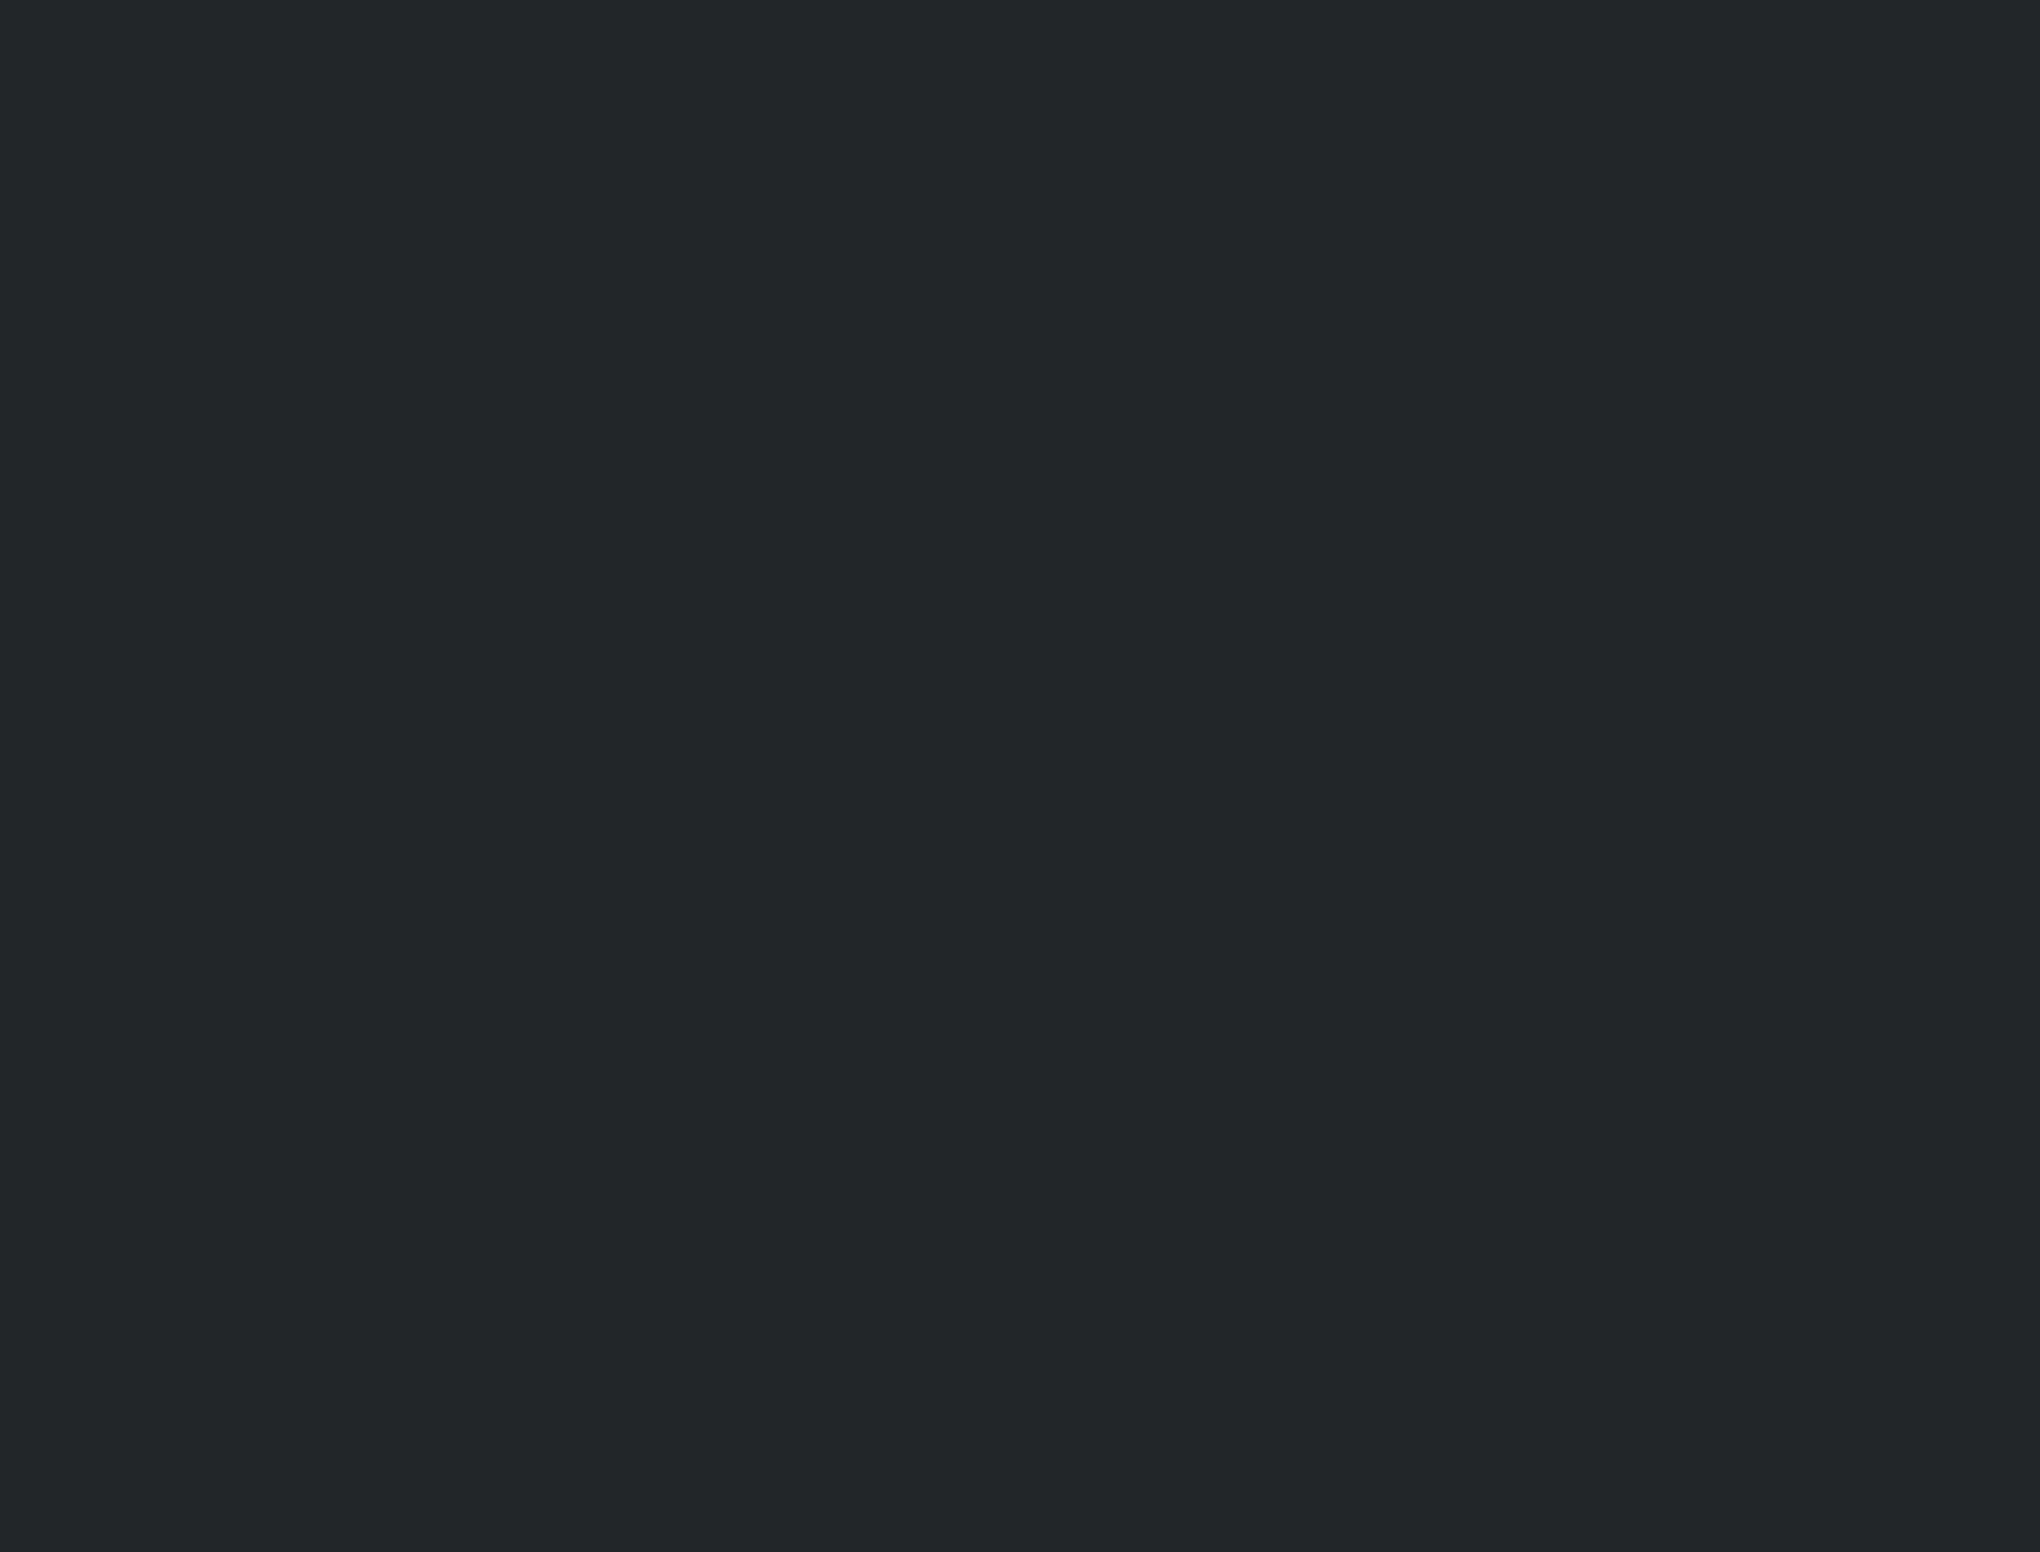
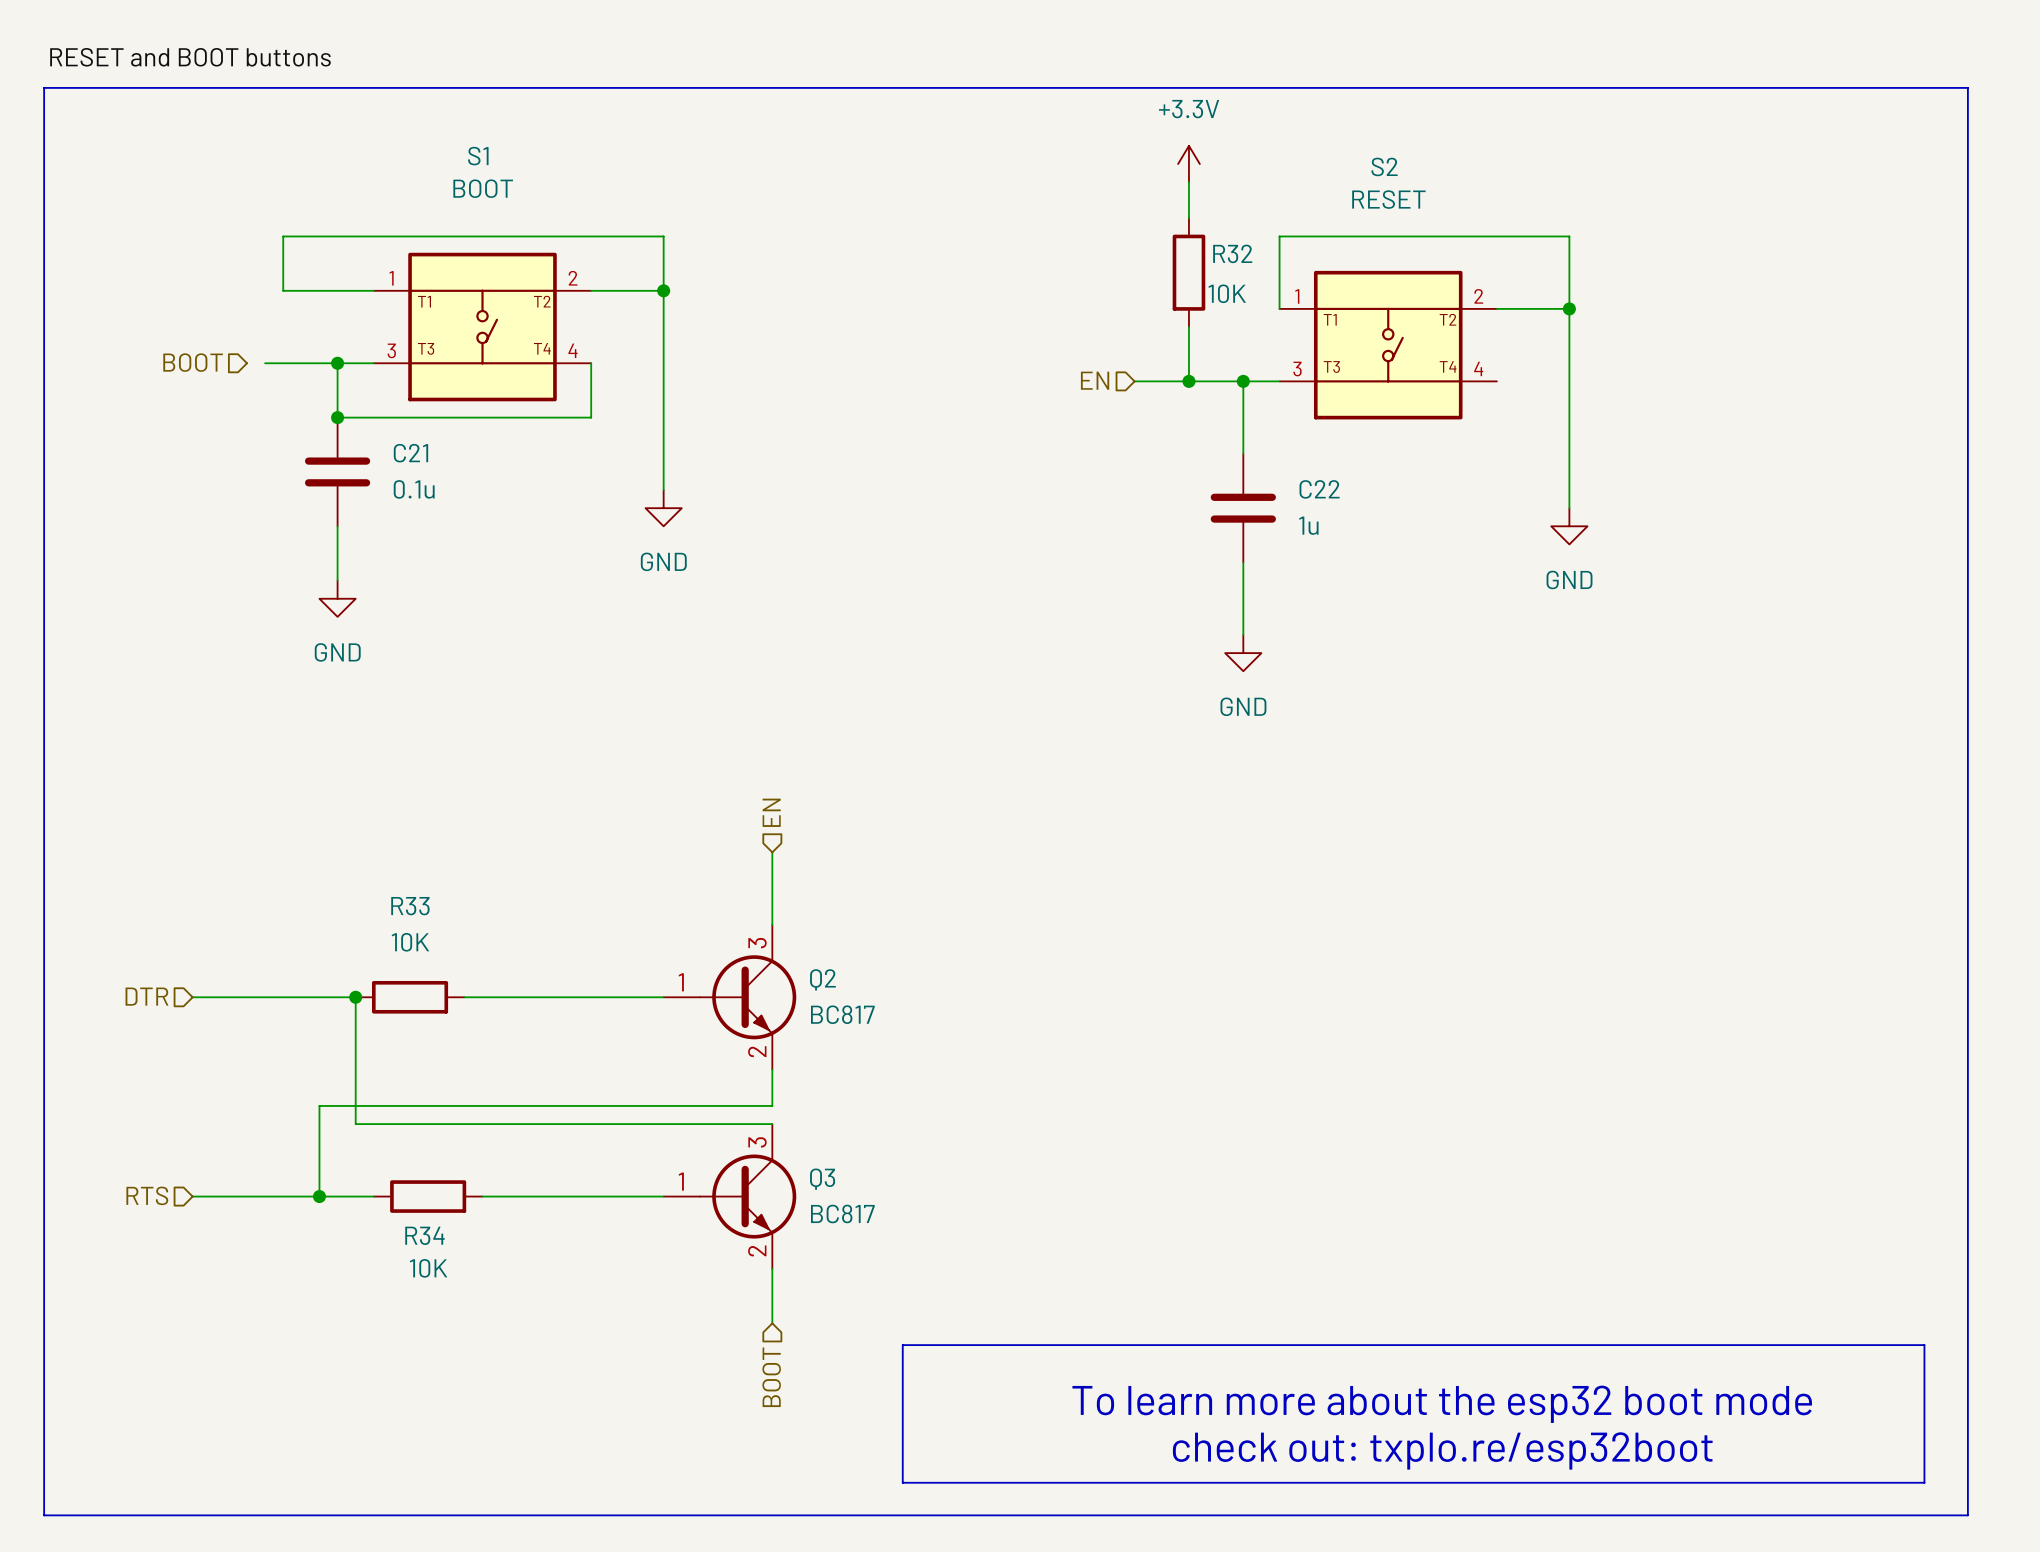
label: none -> RESET and BOOT buttons (190, 57)
line: none -> (44, 87) (1967, 87) (1967, 1515) (44, 1515) (44, 87)
power symbol: none -> +3.3V (1188, 164)
wire: none -> (1188, 182) (1188, 218)
R32: none -> 10K (1188, 272)
wire: none -> (373, 290) (283, 290) (283, 236) (663, 236) (663, 490)
wire: none -> (591, 290) (663, 290)
junction: none -> (663, 290)
wire: none -> (1279, 308) (1279, 236) (1569, 236) (1569, 508)
wire: none -> (1496, 308) (1569, 308)
junction: none -> (1569, 308)
S1: none -> BOOT (482, 327)
wire: none -> (1188, 327) (1188, 381)
S2: none -> RESET (1388, 345)
hierarchical label: none -> BOOT (193, 362)
wire: none -> (265, 363) (373, 363)
wire: none -> (337, 363) (337, 417) (591, 417) (591, 363)
junction: none -> (337, 363)
hierarchical label: none -> EN (1095, 380)
wire: none -> (1134, 381) (1279, 381)
junction: none -> (1188, 381)
wire: none -> (1243, 381) (1243, 453)
junction: none -> (1243, 381)
junction: none -> (337, 417)
C21: none -> 0.1u (337, 471)
power symbol: none -> GND (663, 508)
C22: none -> 1u (1243, 508)
wire: none -> (337, 526) (337, 580)
power symbol: none -> GND (1569, 526)
wire: none -> (1243, 562) (1243, 634)
power symbol: none -> GND (337, 598)
power symbol: none -> GND (1243, 653)
hierarchical label: none -> EN (771, 812)
wire: none -> (772, 852) (772, 924)
hierarchical label: none -> DTR (146, 996)
wire: none -> (192, 997) (355, 997) (355, 1124) (772, 1124)
junction: none -> (355, 997)
R33: none -> 10K (410, 997)
wire: none -> (464, 997) (663, 997)
Q2: none -> BC817 (729, 997)
wire: none -> (772, 1069) (772, 1105) (319, 1105) (319, 1196)
hierarchical label: none -> RTS (147, 1195)
wire: none -> (192, 1196) (373, 1196)
junction: none -> (319, 1196)
R34: none -> 10K (428, 1196)
wire: none -> (482, 1196) (663, 1196)
Q3: none -> BC817 (729, 1196)
wire: none -> (772, 1269) (772, 1323)
line: none -> (902, 1345) (1924, 1345) (1924, 1482) (902, 1482) (902, 1345)
hierarchical label: none -> BOOT (771, 1377)
text: none -> To learn more about the esp32 boot mode (1442, 1404)
text: none -> check out: txplo.re/esp32boot (1442, 1450)

